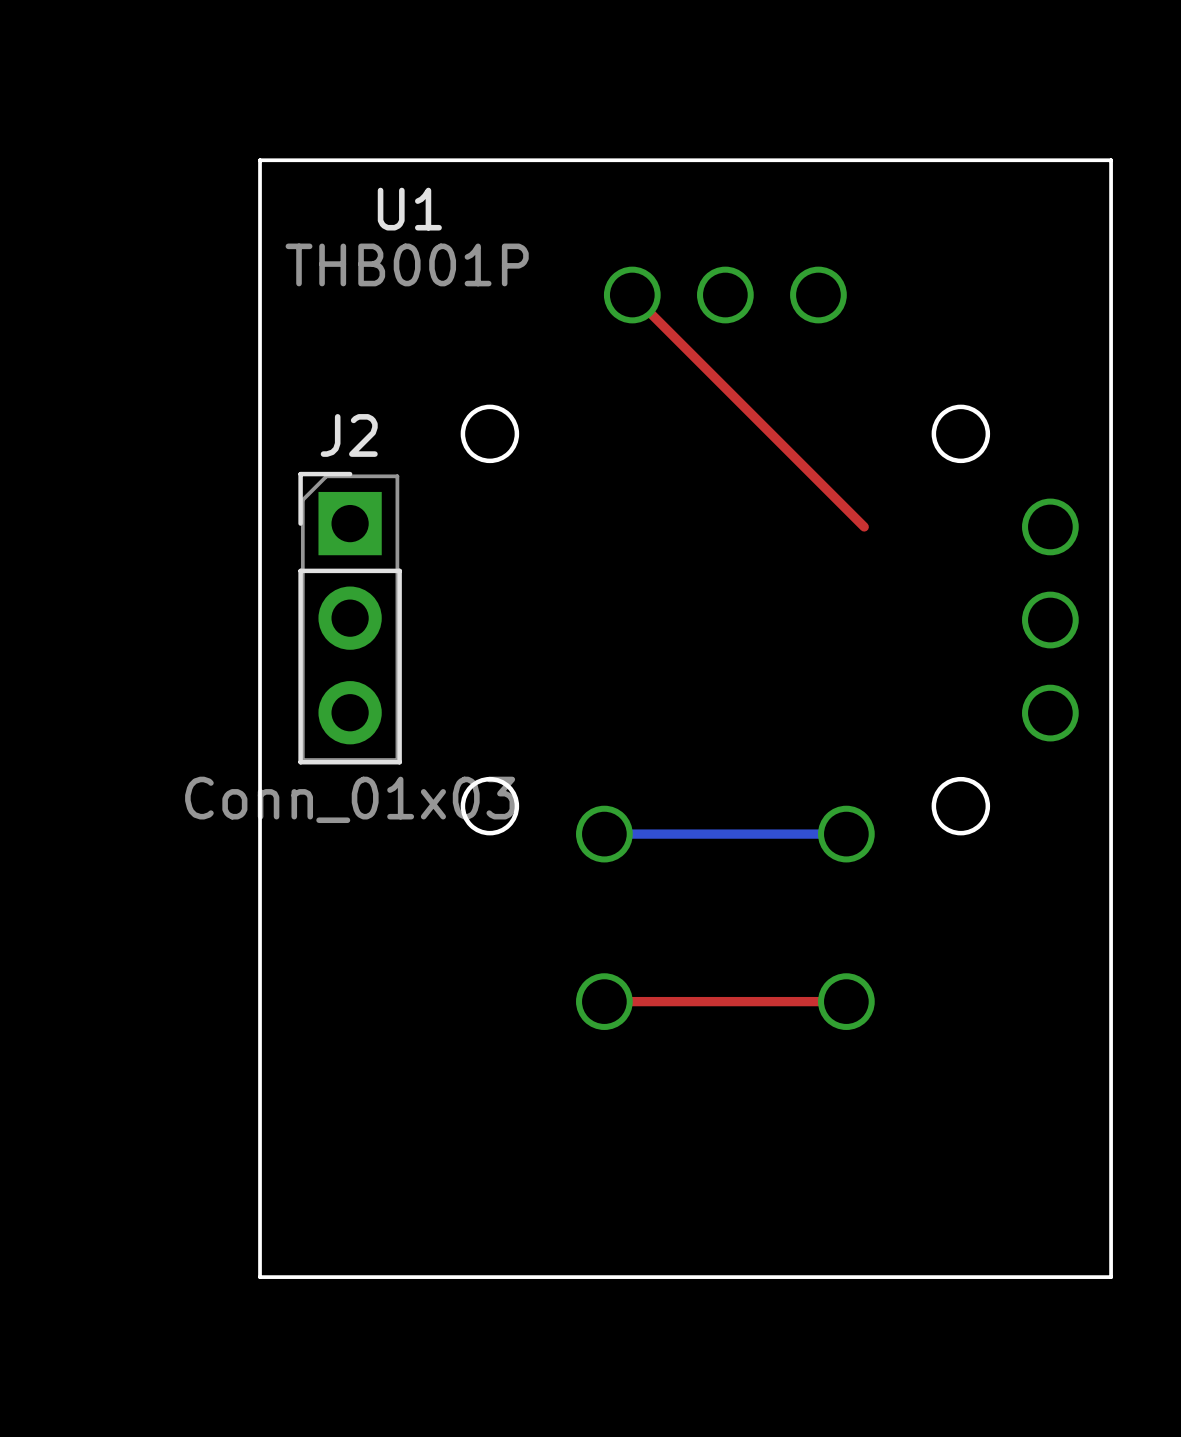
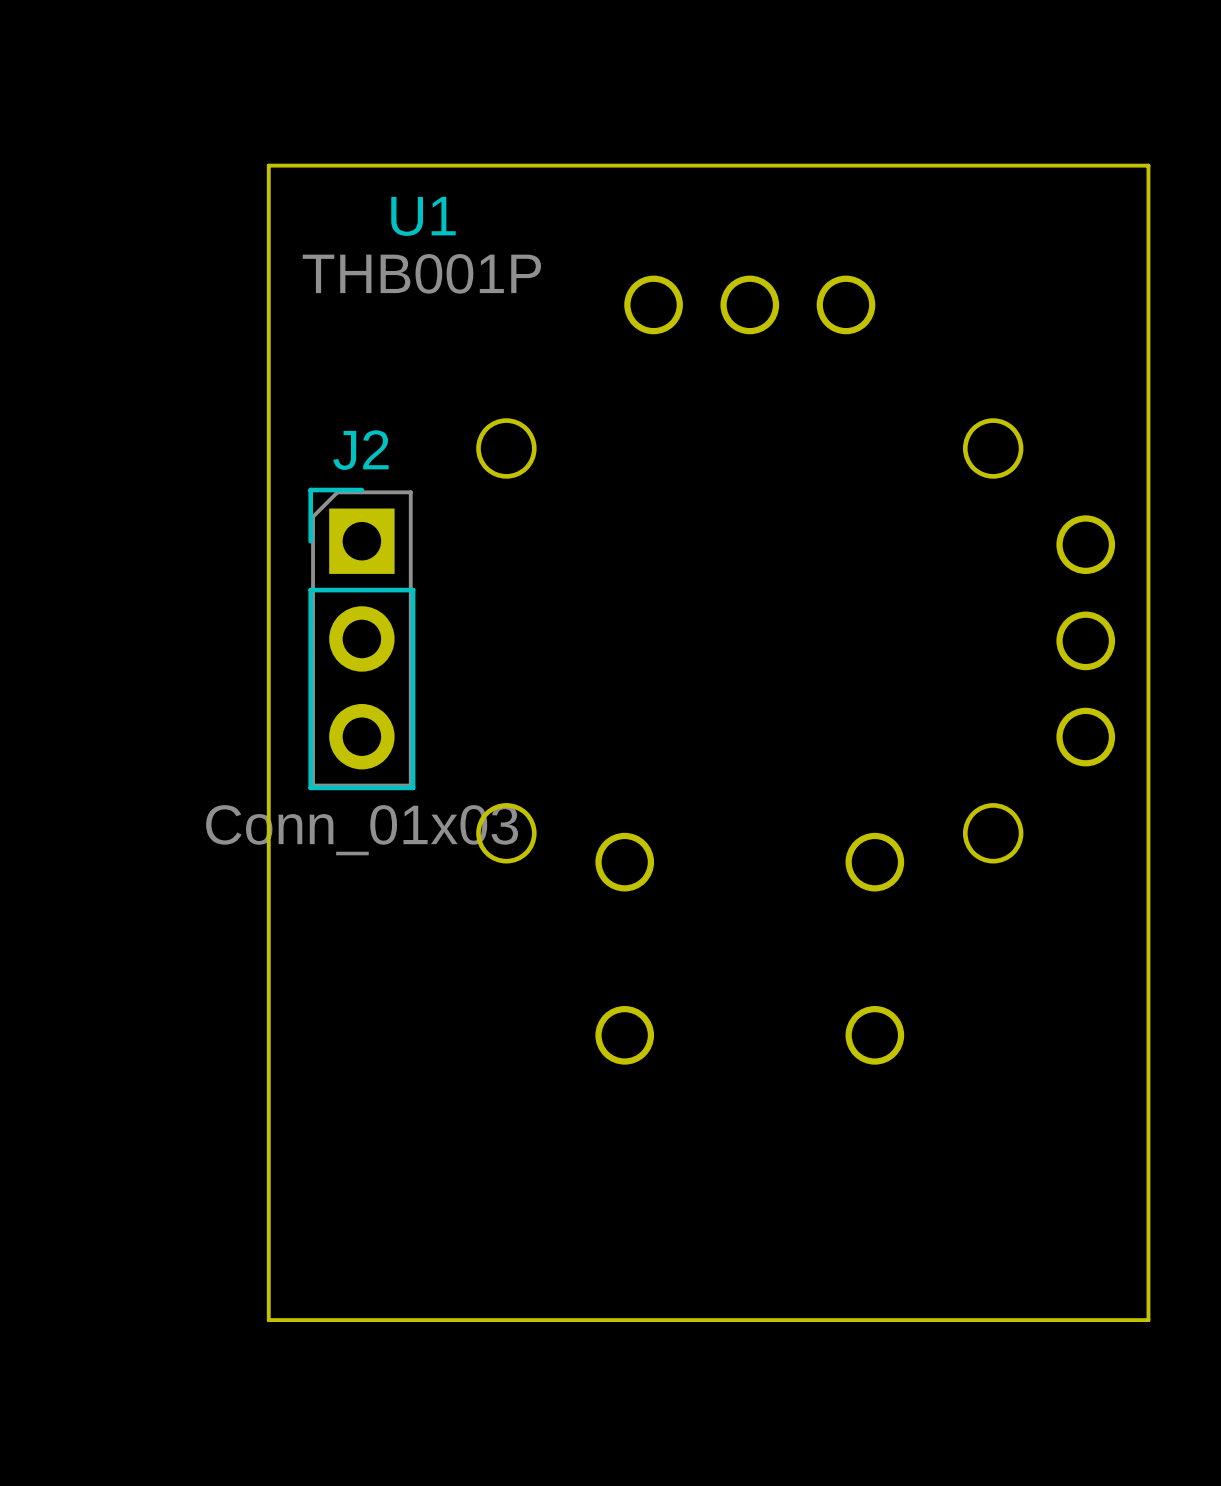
top track: (632, 295) (864, 526) -> none
bottom track: (604, 834) (846, 834) -> none
top track: (604, 1001) (846, 1001) -> none

